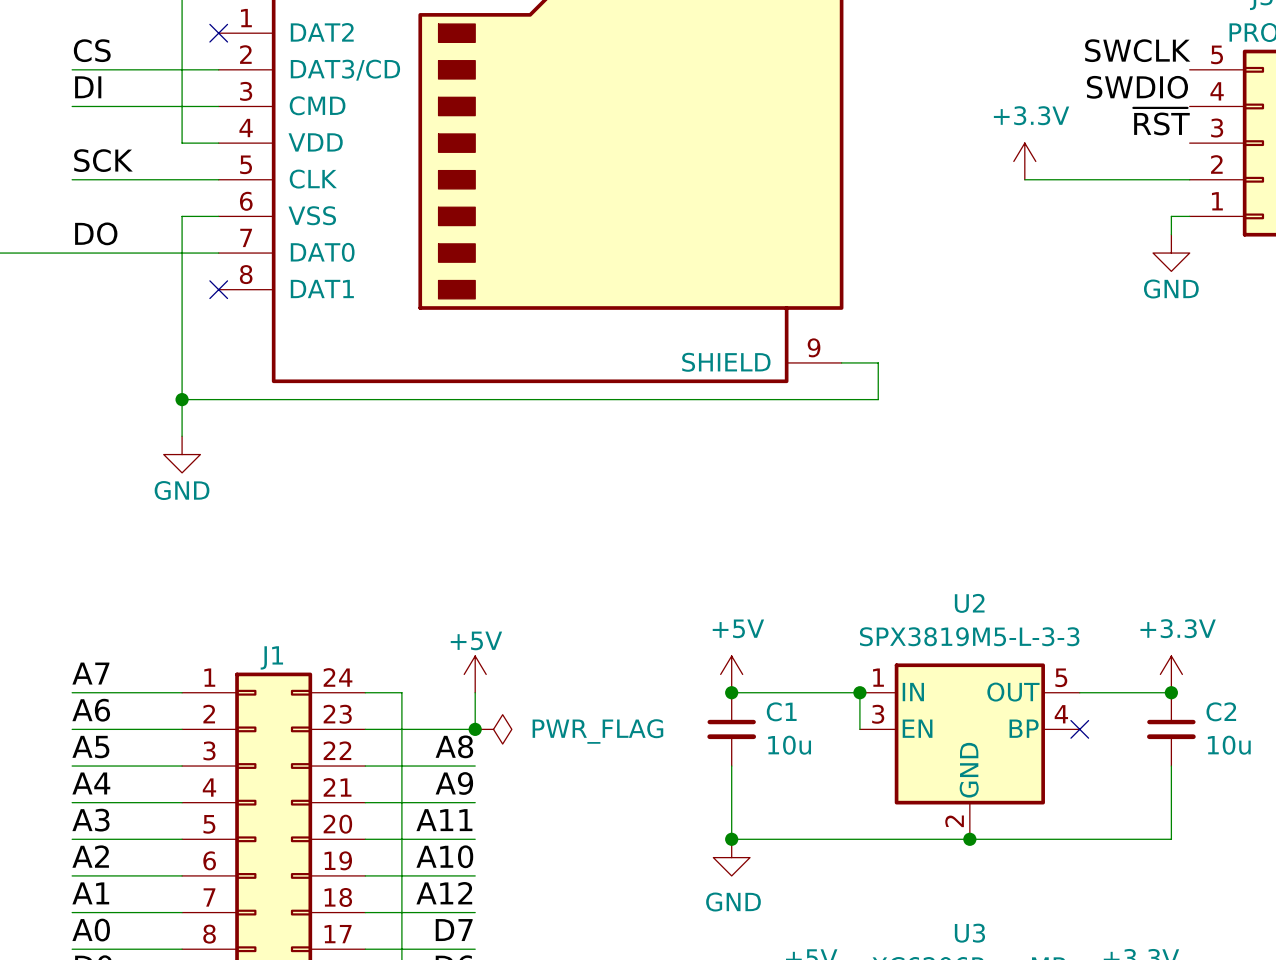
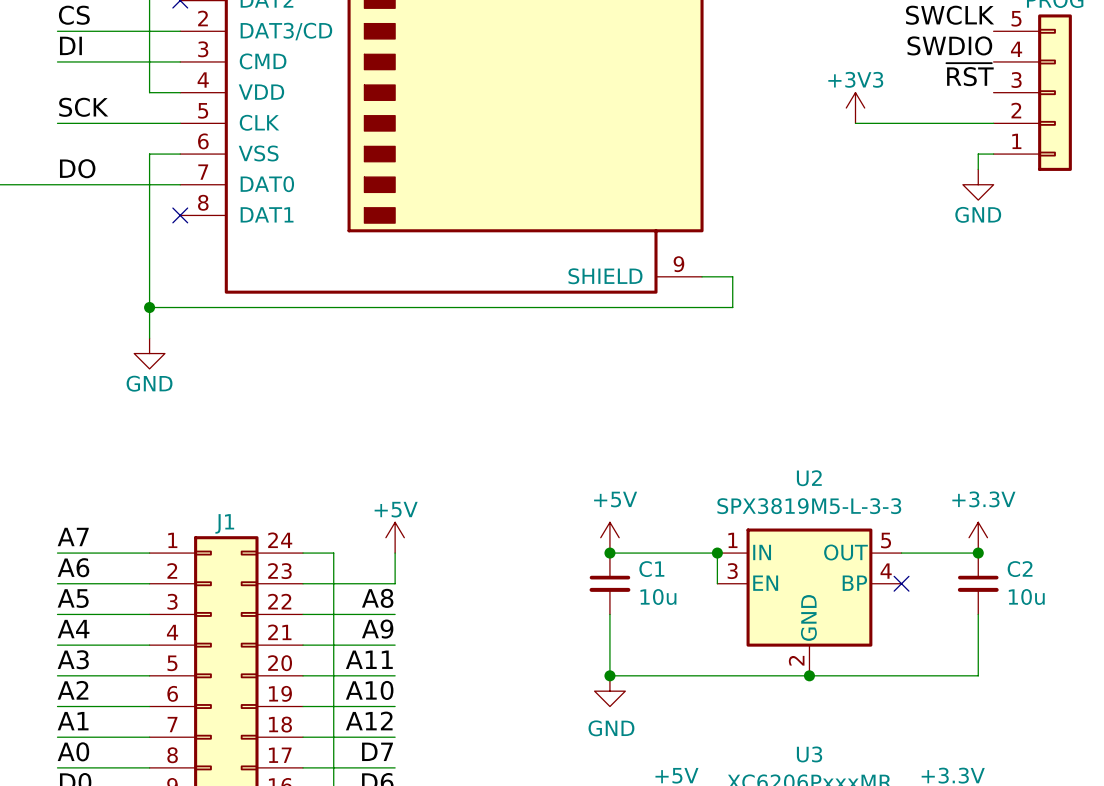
power symbol: +3.3V (1024, 161) -> +3V3 (855, 108)
junction: (475, 729) -> none
power symbol: PWR_FLAG (493, 729) -> none

